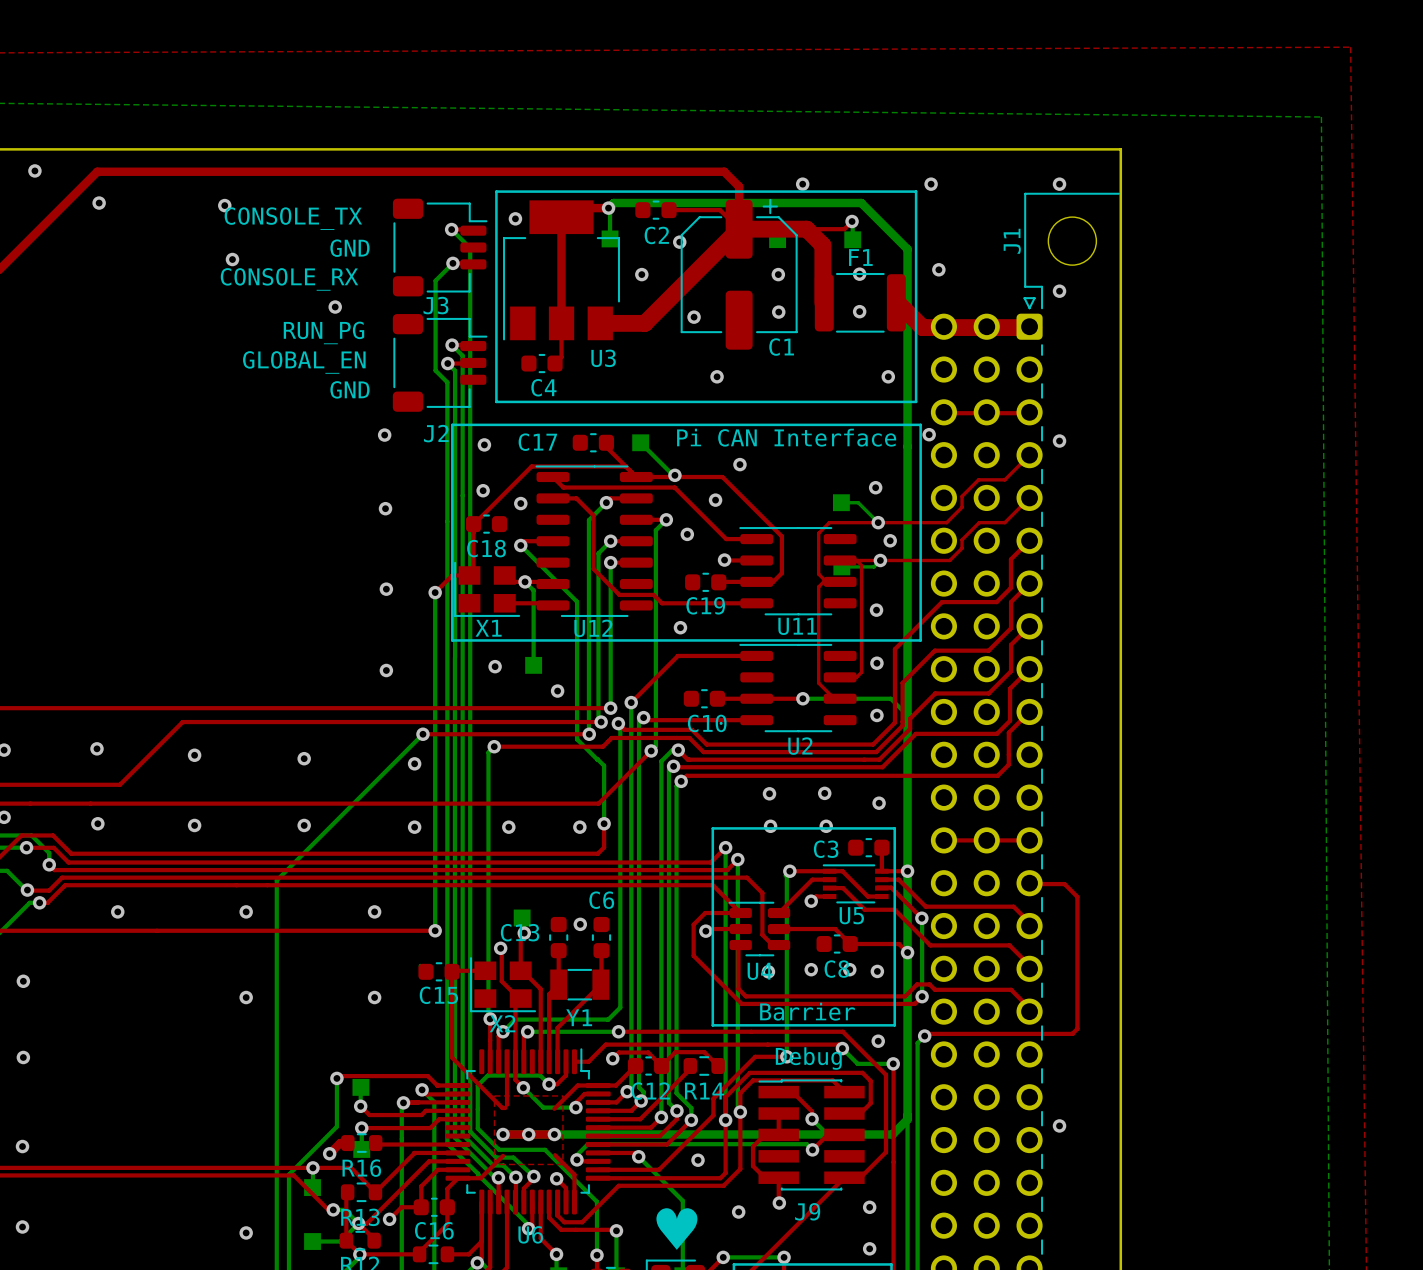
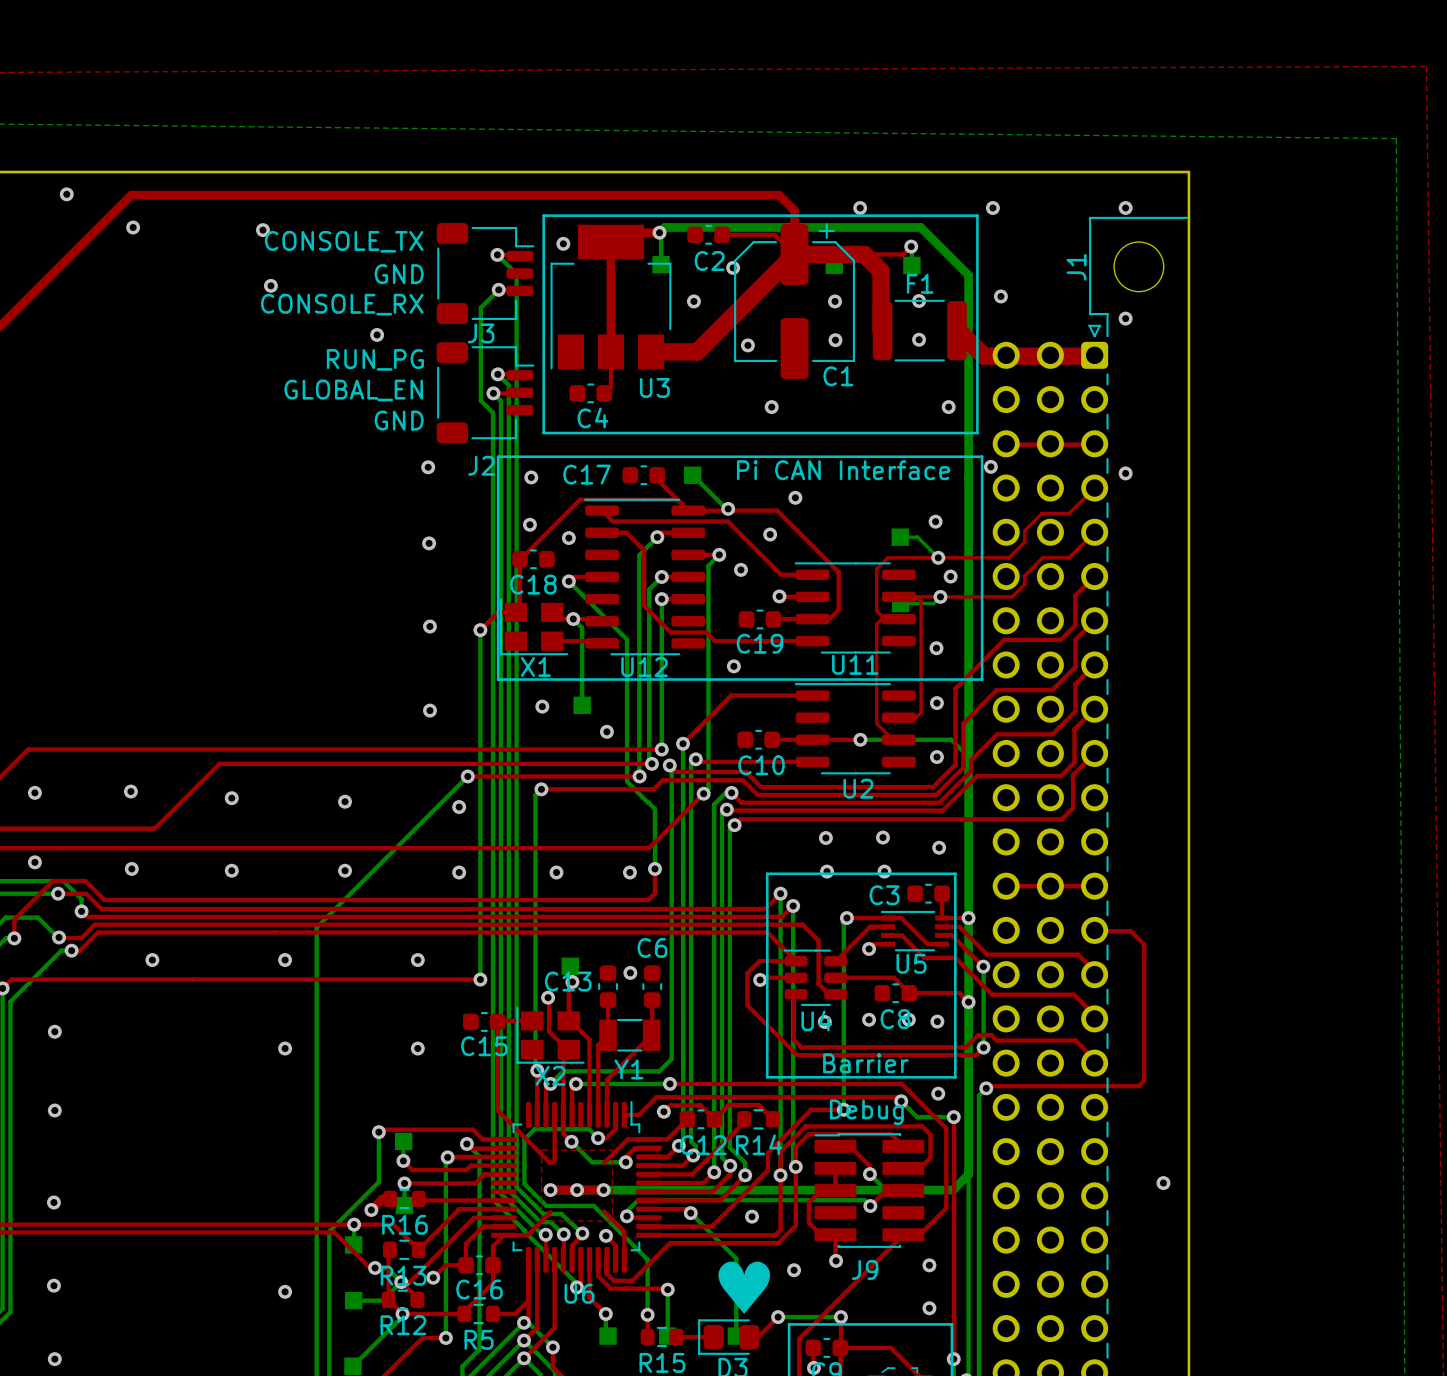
via position: (1059, 1125) -> (1163, 1183)

